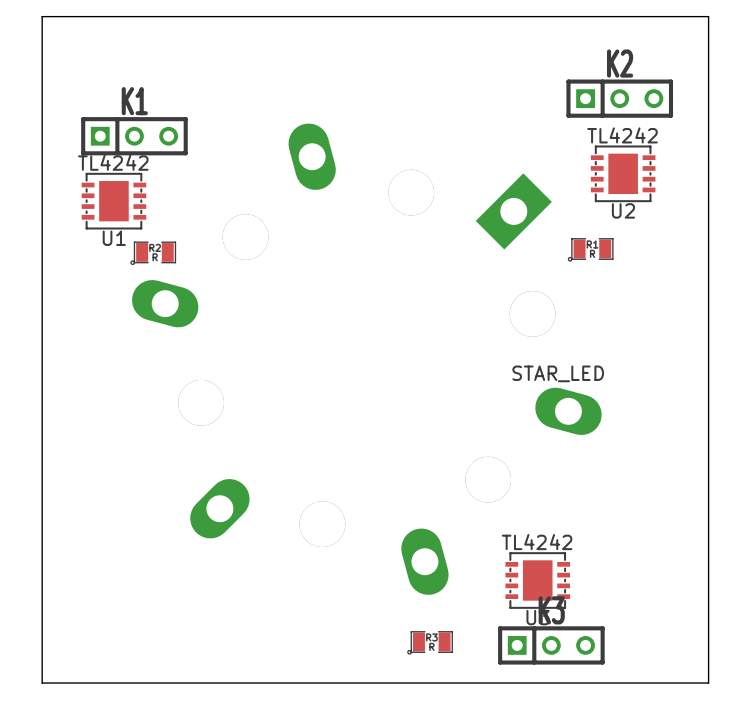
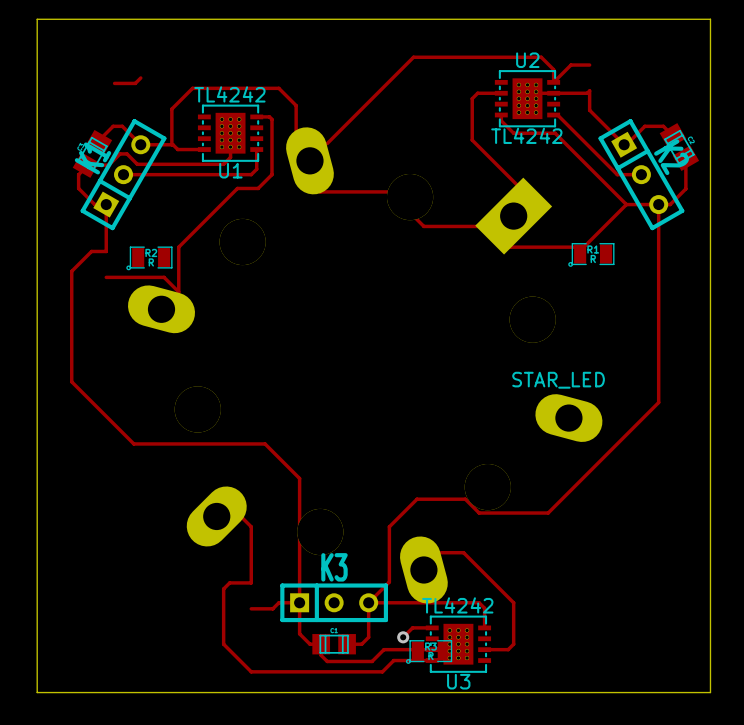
track: none -> (589, 65) (571, 65) (553, 82) (553, 69) (541, 57) (413, 57) (327, 143)
track: none -> (140, 77) (135, 83) (114, 83)
track: none -> (501, 93) (477, 93) (472, 98) (472, 140) (530, 198)
track: none -> (527, 98) (532, 93) (587, 93) (589, 90) (589, 110) (624, 144) (626, 144) (644, 126) (663, 126) (672, 135)
K2 rotation: 0° (619, 98) -> 60° clockwise (641, 174)
K2 position: (619, 98) -> (641, 174)
track: none -> (501, 115) (501, 120) (513, 133) (555, 133) (626, 204)
track: none -> (553, 115) (557, 115) (617, 174) (641, 174)
track: none -> (256, 116) (269, 116) (271, 119) (271, 174) (258, 188) (237, 188) (178, 247) (178, 292) (164, 277) (106, 277)
track: none -> (230, 133) (230, 157) (223, 164) (137, 164) (126, 153) (120, 153) (108, 165) (85, 165) (78, 174) (78, 188) (94, 204) (106, 204) (106, 251) (91, 251) (71, 271) (71, 381) (133, 443) (265, 443) (299, 478) (299, 633) (309, 644) (321, 644) (321, 655) (327, 661) (372, 661) (383, 649) (452, 649) (458, 644)
U2 value position: TL4242 (622, 135) -> TL4242 (526, 135)
K1 rotation: 0° (134, 136) -> 60° counterclockwise (123, 174)
track: none -> (98, 142) (113, 126) (122, 126) (140, 144) (173, 144) (177, 149) (204, 149)
track: none -> (171, 144) (171, 109) (192, 88) (278, 88) (296, 105) (296, 167) (320, 191) (389, 191) (423, 226) (489, 226) (510, 247) (583, 247) (626, 204)
part: none -> (679, 147)
track: none -> (256, 149) (256, 169) (251, 174) (123, 174)
U2 footprint: [590, 145, 656, 203] -> [494, 70, 561, 128]
part: none -> (92, 153)
track: none -> (685, 158) (685, 188) (670, 204) (626, 204)
U1 footprint: [81, 172, 147, 230] -> [197, 104, 264, 162]
track: none -> (658, 204) (658, 402) (548, 513) (479, 513) (465, 499) (417, 499) (389, 526) (389, 582) (368, 602)
U2 name position: U2 (623, 210) -> U2 (527, 60)
track: none -> (234, 499) (234, 509) (251, 526) (251, 582) (229, 582) (223, 588) (223, 644) (251, 671) (382, 671) (393, 660) (432, 660)
track: none -> (441, 552) (463, 552) (513, 602) (513, 644) (508, 649) (484, 649)
U3 footprint: [505, 552, 571, 609] -> [425, 615, 492, 673]
track: none -> (299, 602) (278, 602) (272, 608) (251, 608)
track: none -> (368, 602) (479, 602) (484, 608) (484, 627)
track: none -> (368, 602) (368, 637) (361, 644) (347, 644)
track: none -> (432, 627) (412, 627) (403, 637)
via: none -> (403, 637)
part: none -> (334, 644)
K3 position: (551, 645) -> (334, 602)

